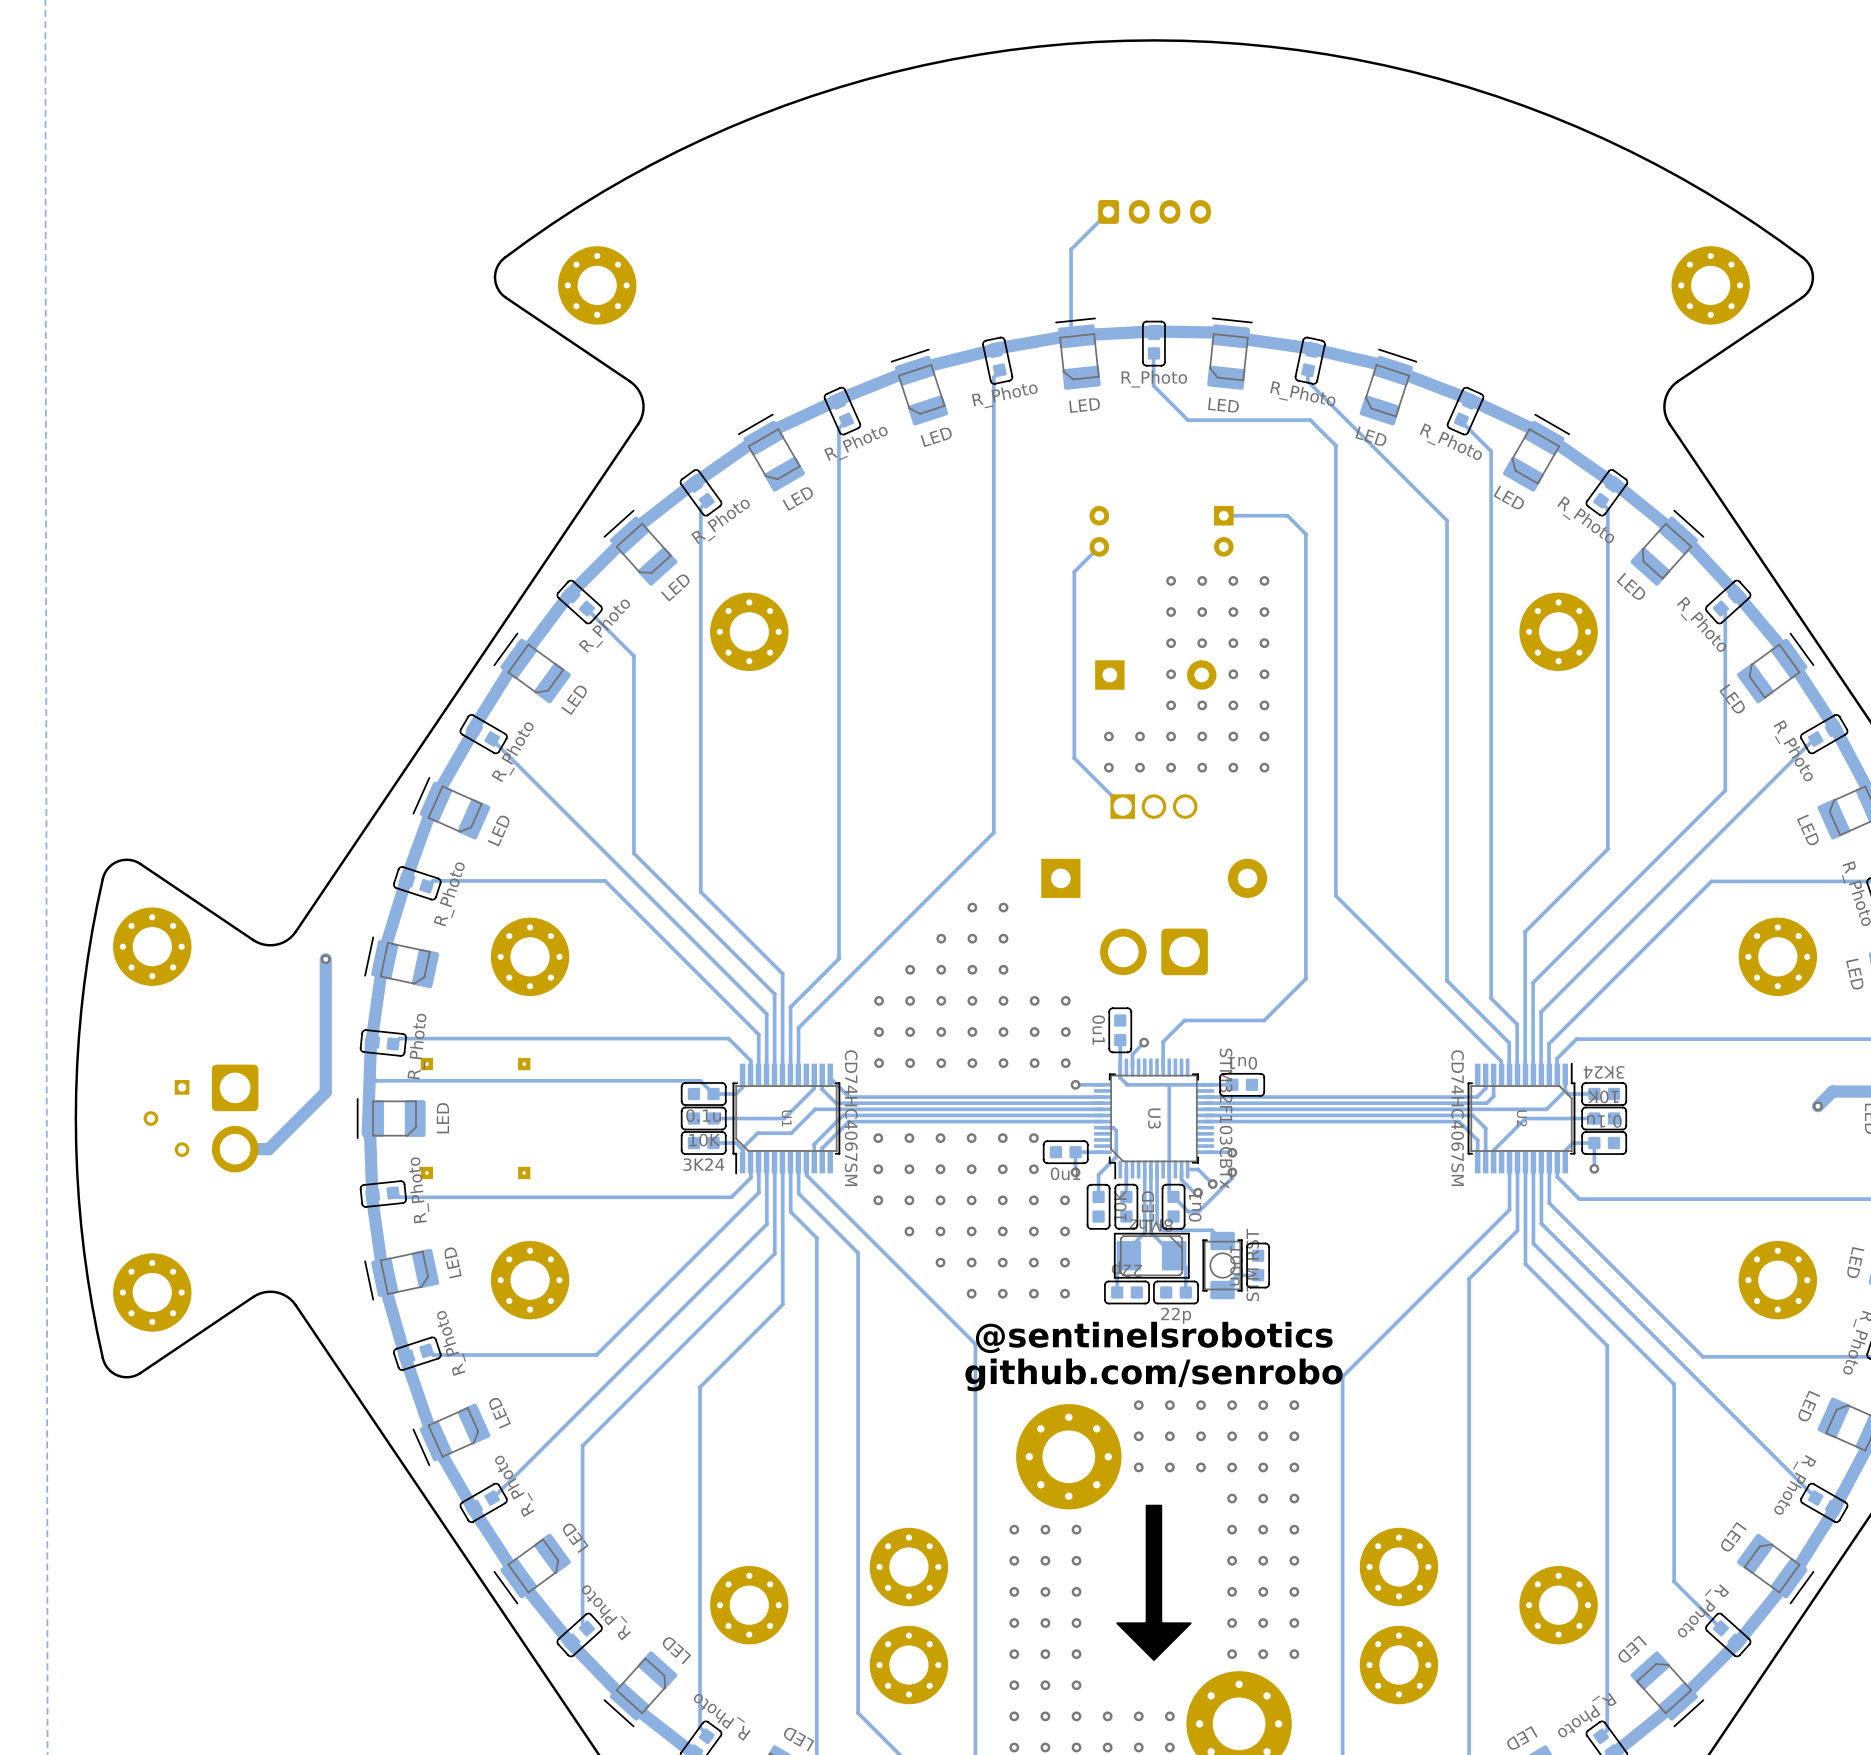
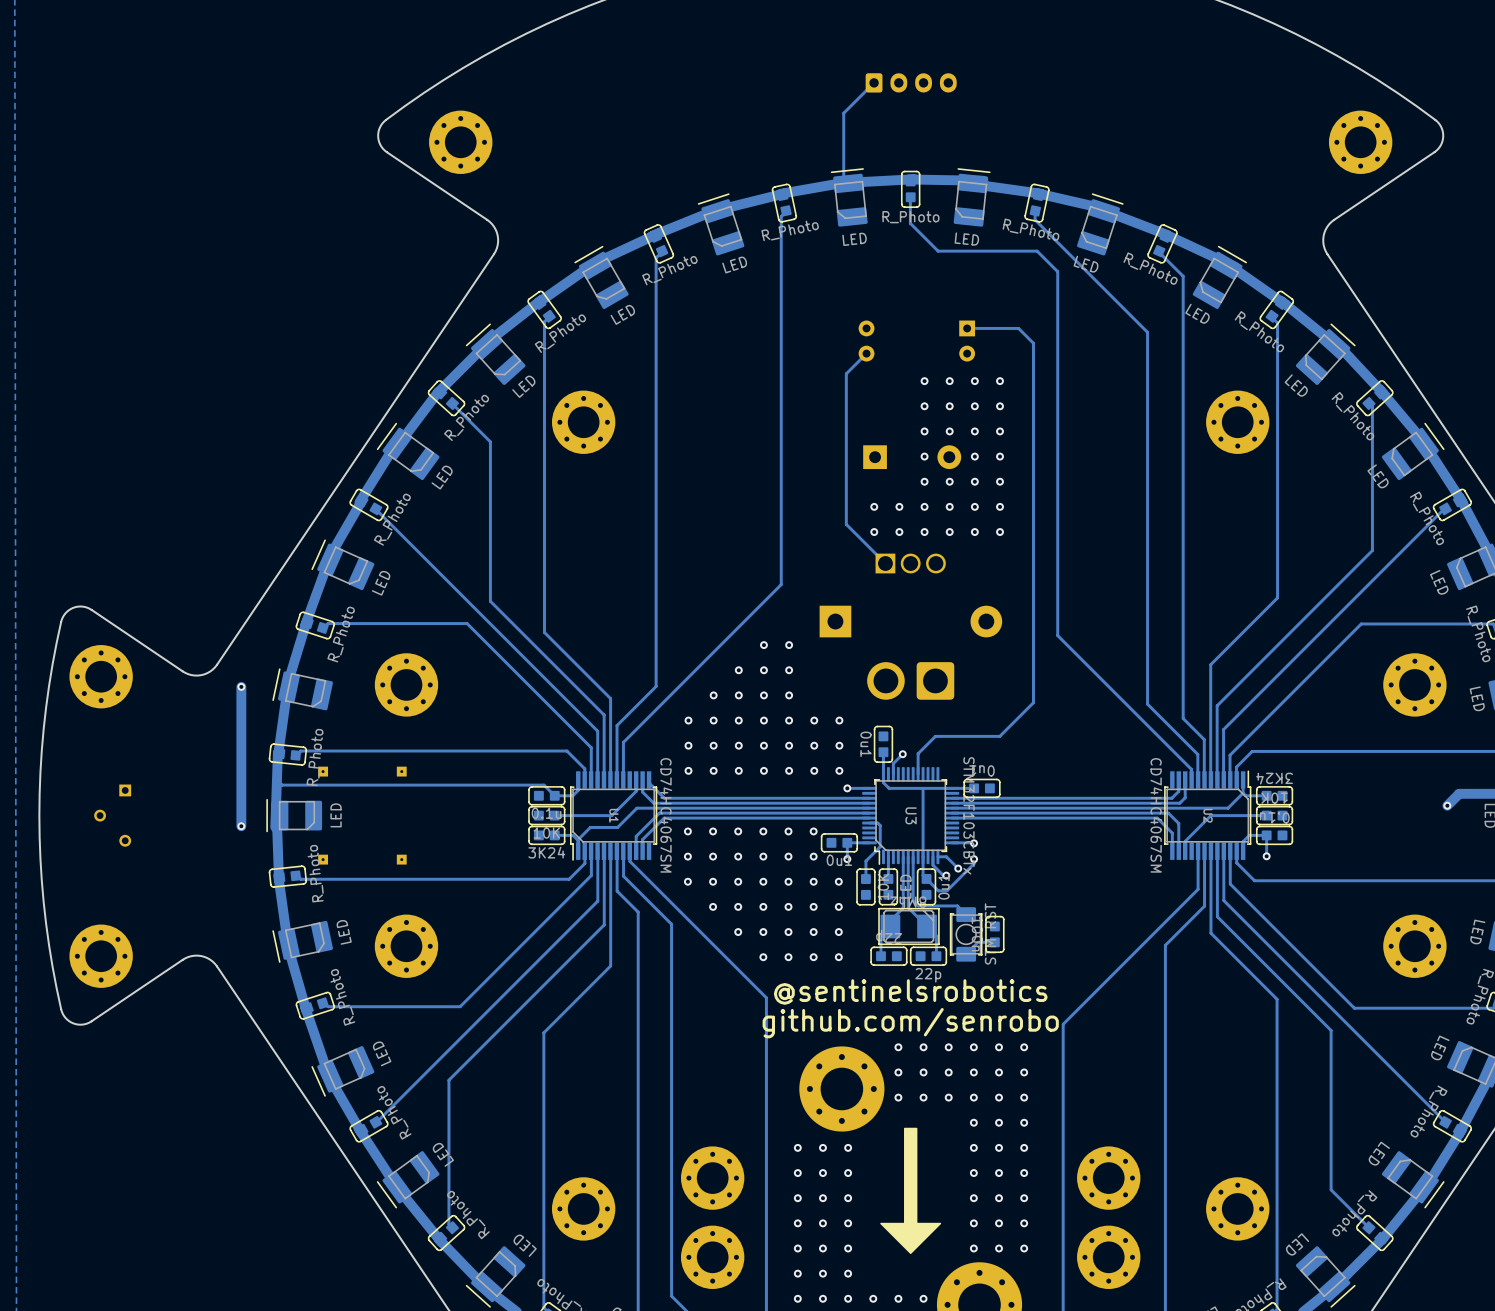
track: (325, 1092) (268, 1149) (235, 1149) -> (241, 794) (241, 826)
part: (235, 1118) -> none
via: none -> (241, 826)

